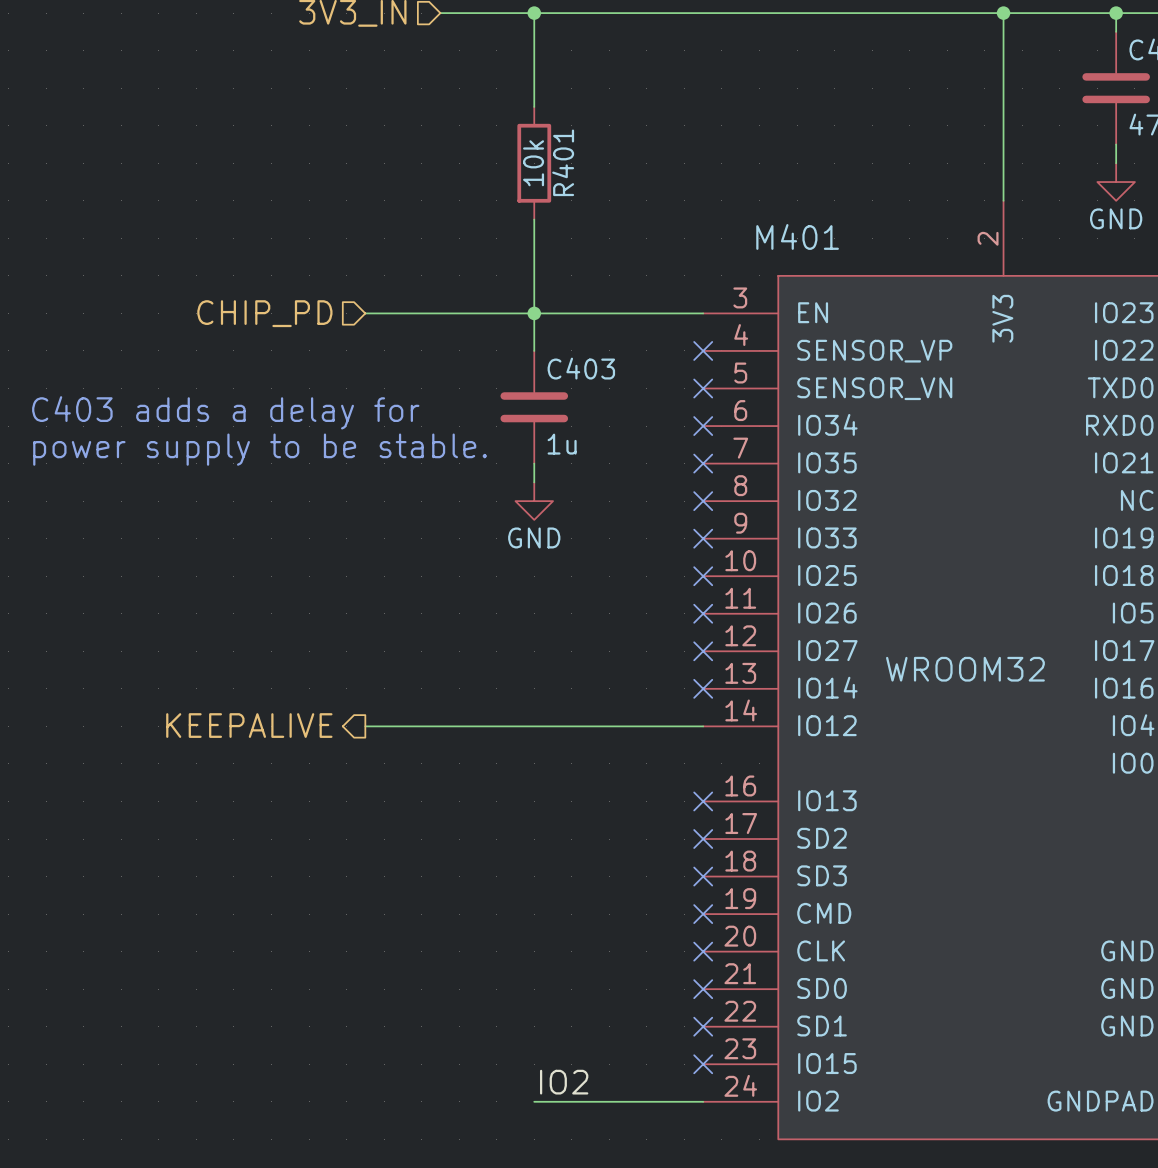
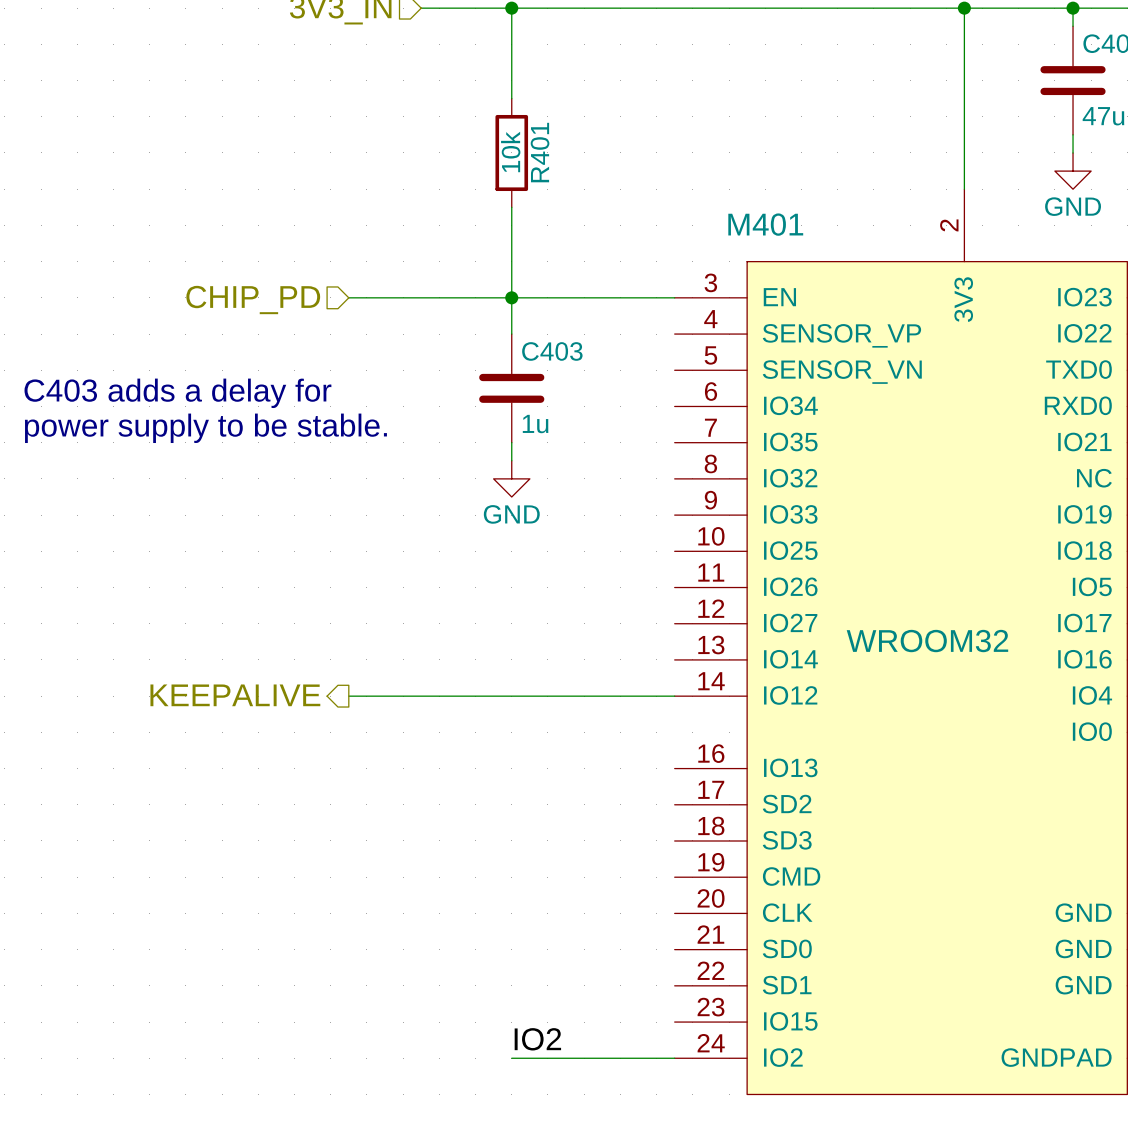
no-connect mark: (703, 350) -> none
no-connect mark: (703, 388) -> none
no-connect mark: (703, 426) -> none
no-connect mark: (703, 463) -> none
no-connect mark: (703, 501) -> none
no-connect mark: (703, 538) -> none
no-connect mark: (703, 576) -> none
no-connect mark: (703, 613) -> none
no-connect mark: (703, 651) -> none
no-connect mark: (703, 688) -> none
no-connect mark: (703, 801) -> none
no-connect mark: (703, 839) -> none
no-connect mark: (703, 876) -> none
no-connect mark: (703, 914) -> none
no-connect mark: (703, 951) -> none
no-connect mark: (703, 989) -> none
no-connect mark: (703, 1026) -> none
no-connect mark: (703, 1064) -> none

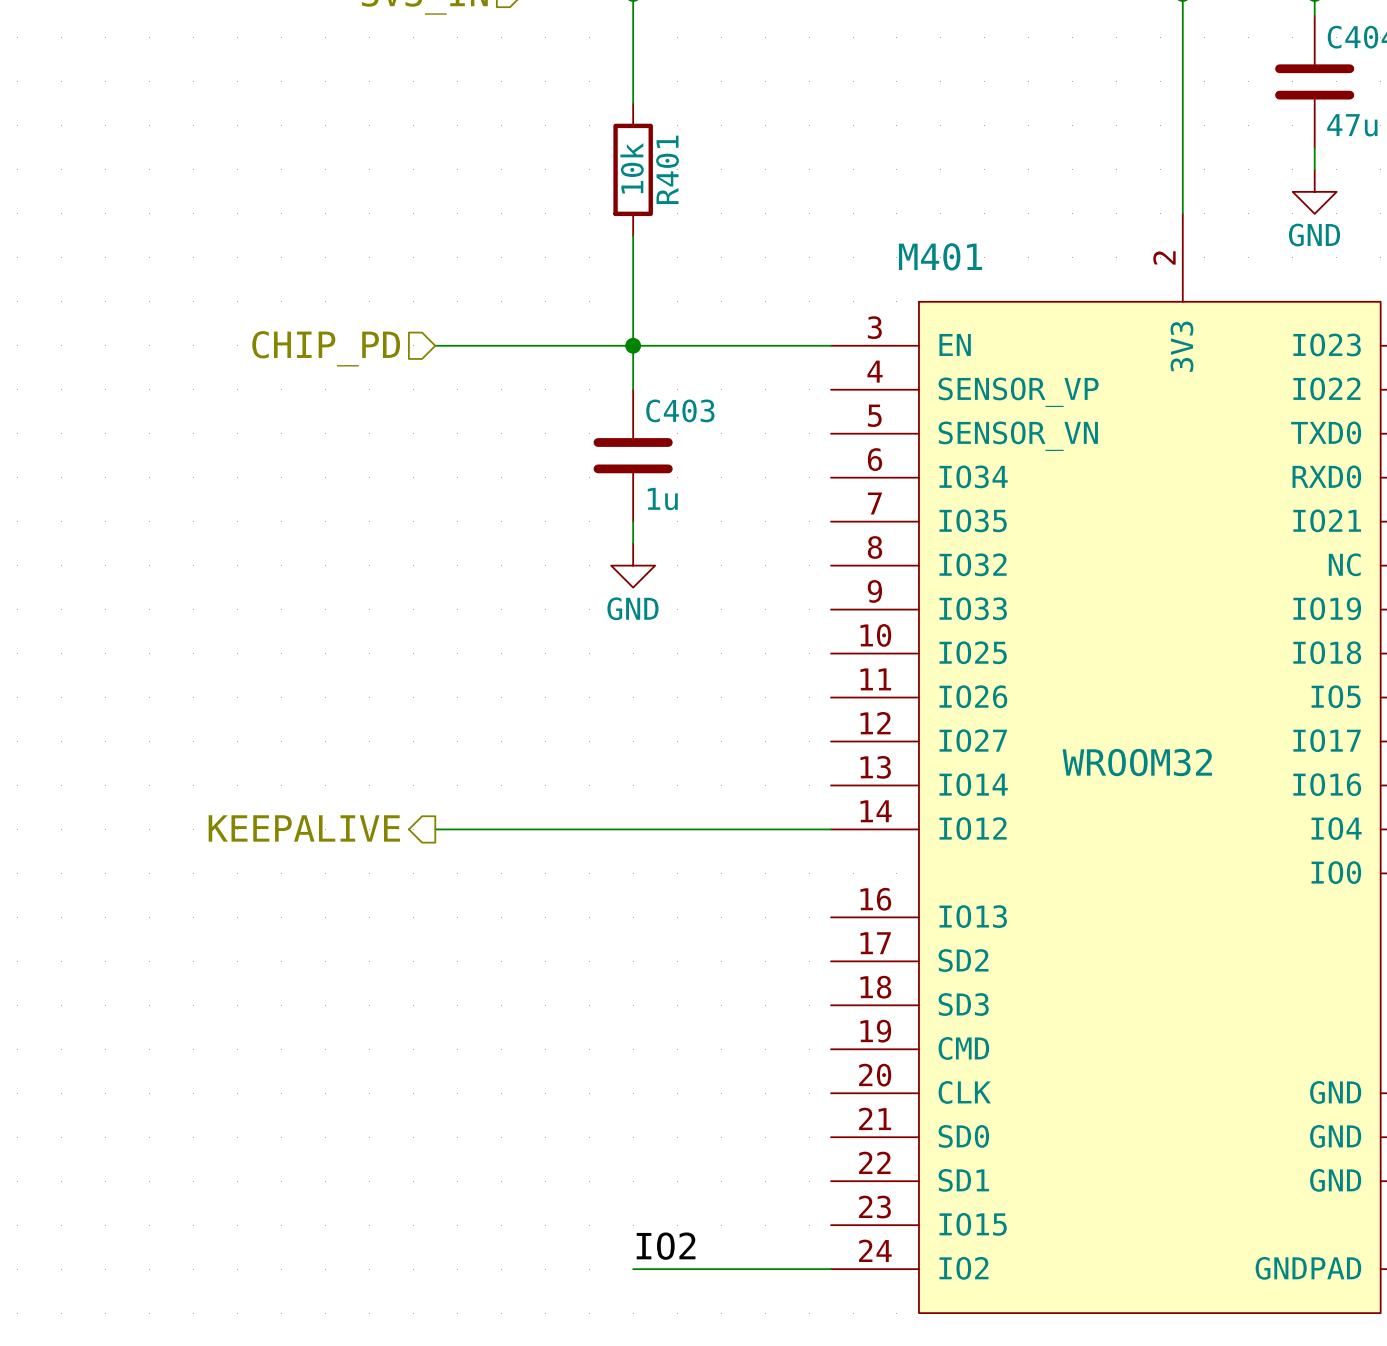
text: C403 adds a delay for (177, 393) -> none
text: power supply to be stable. (205, 428) -> none

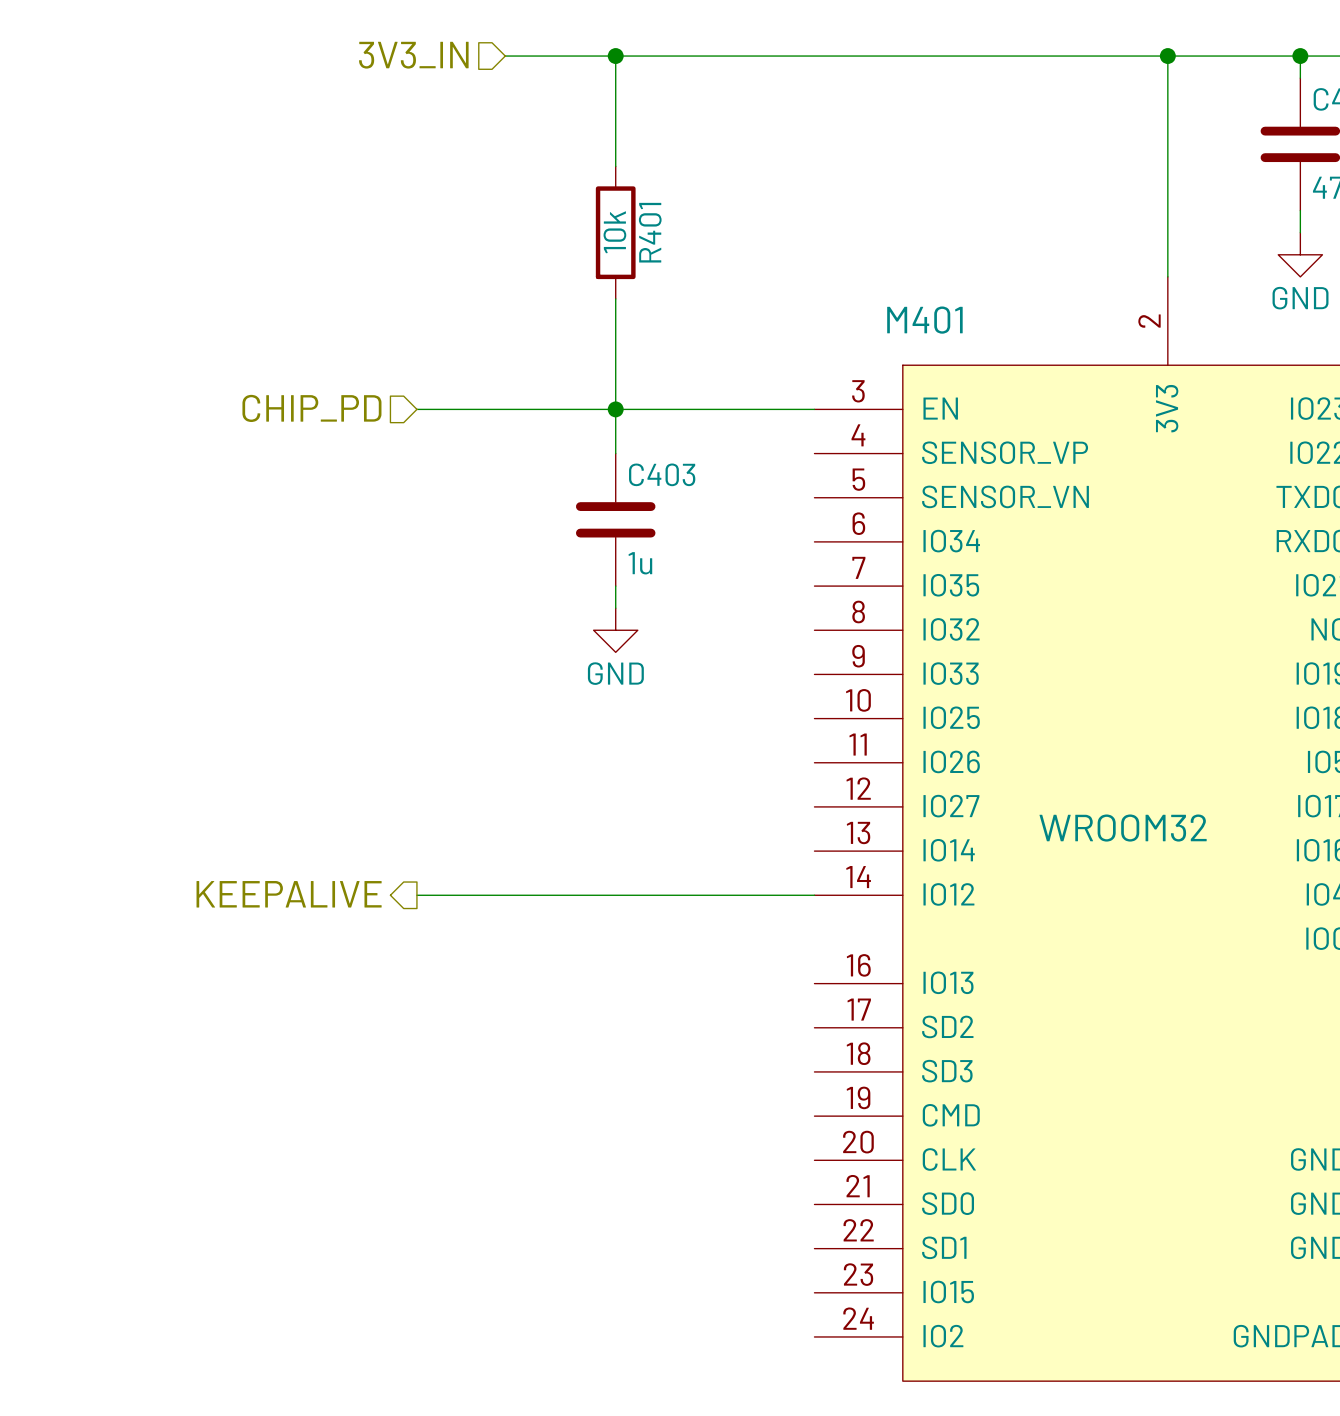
label: IO2 (666, 1246) -> none
wire: (633, 1269) (831, 1269) -> none

